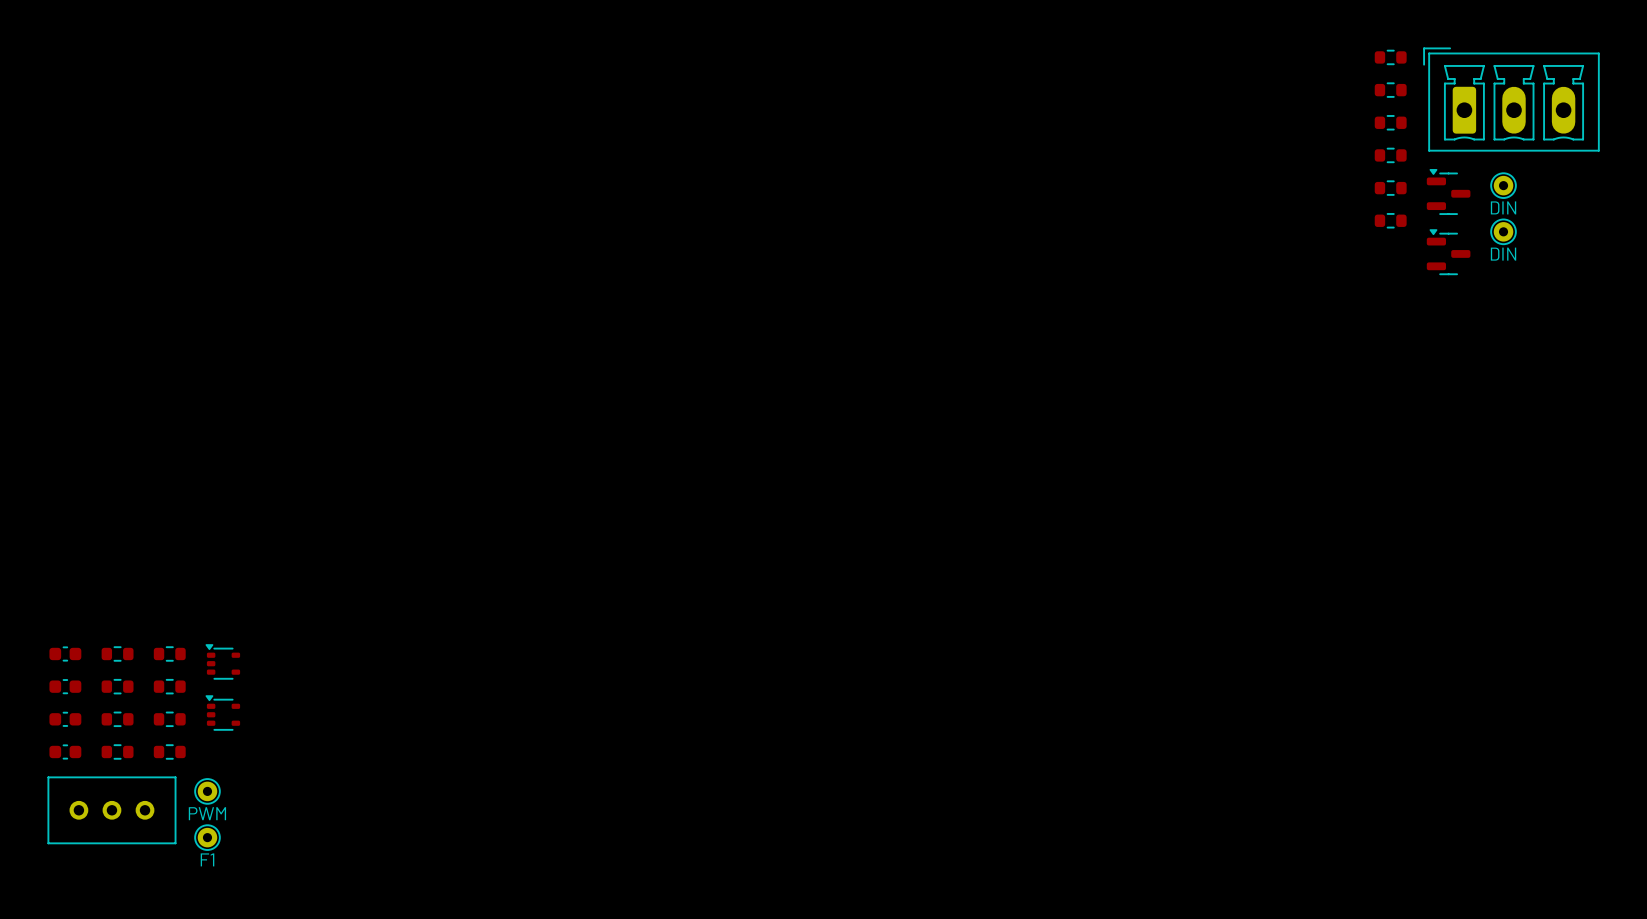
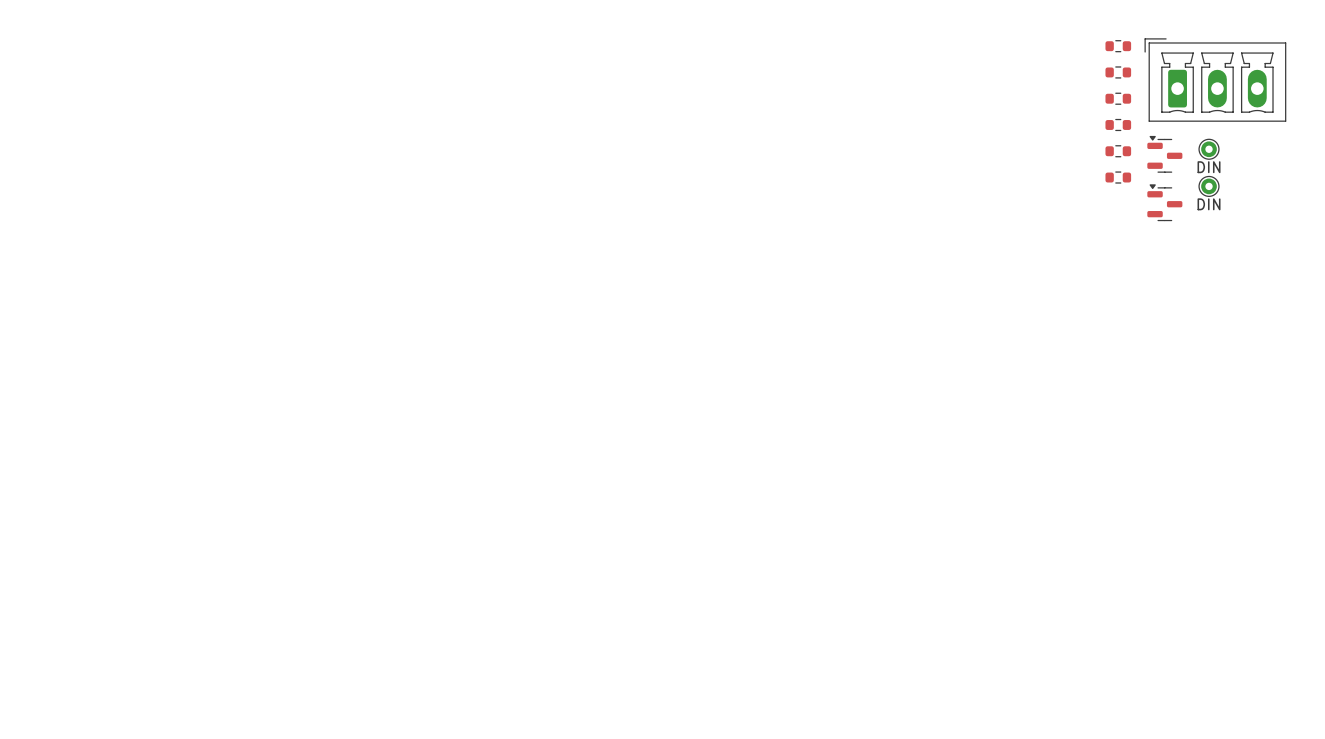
part: (65, 653) -> none
part: (117, 653) -> none
part: (169, 653) -> none
part: (222, 661) -> none
part: (65, 686) -> none
part: (117, 686) -> none
part: (169, 686) -> none
part: (222, 712) -> none
part: (65, 719) -> none
part: (117, 719) -> none
part: (169, 719) -> none
part: (65, 751) -> none
part: (117, 751) -> none
part: (169, 751) -> none
part: PWM (207, 791) -> none
part: (111, 810) -> none
part: F1 (207, 837) -> none

